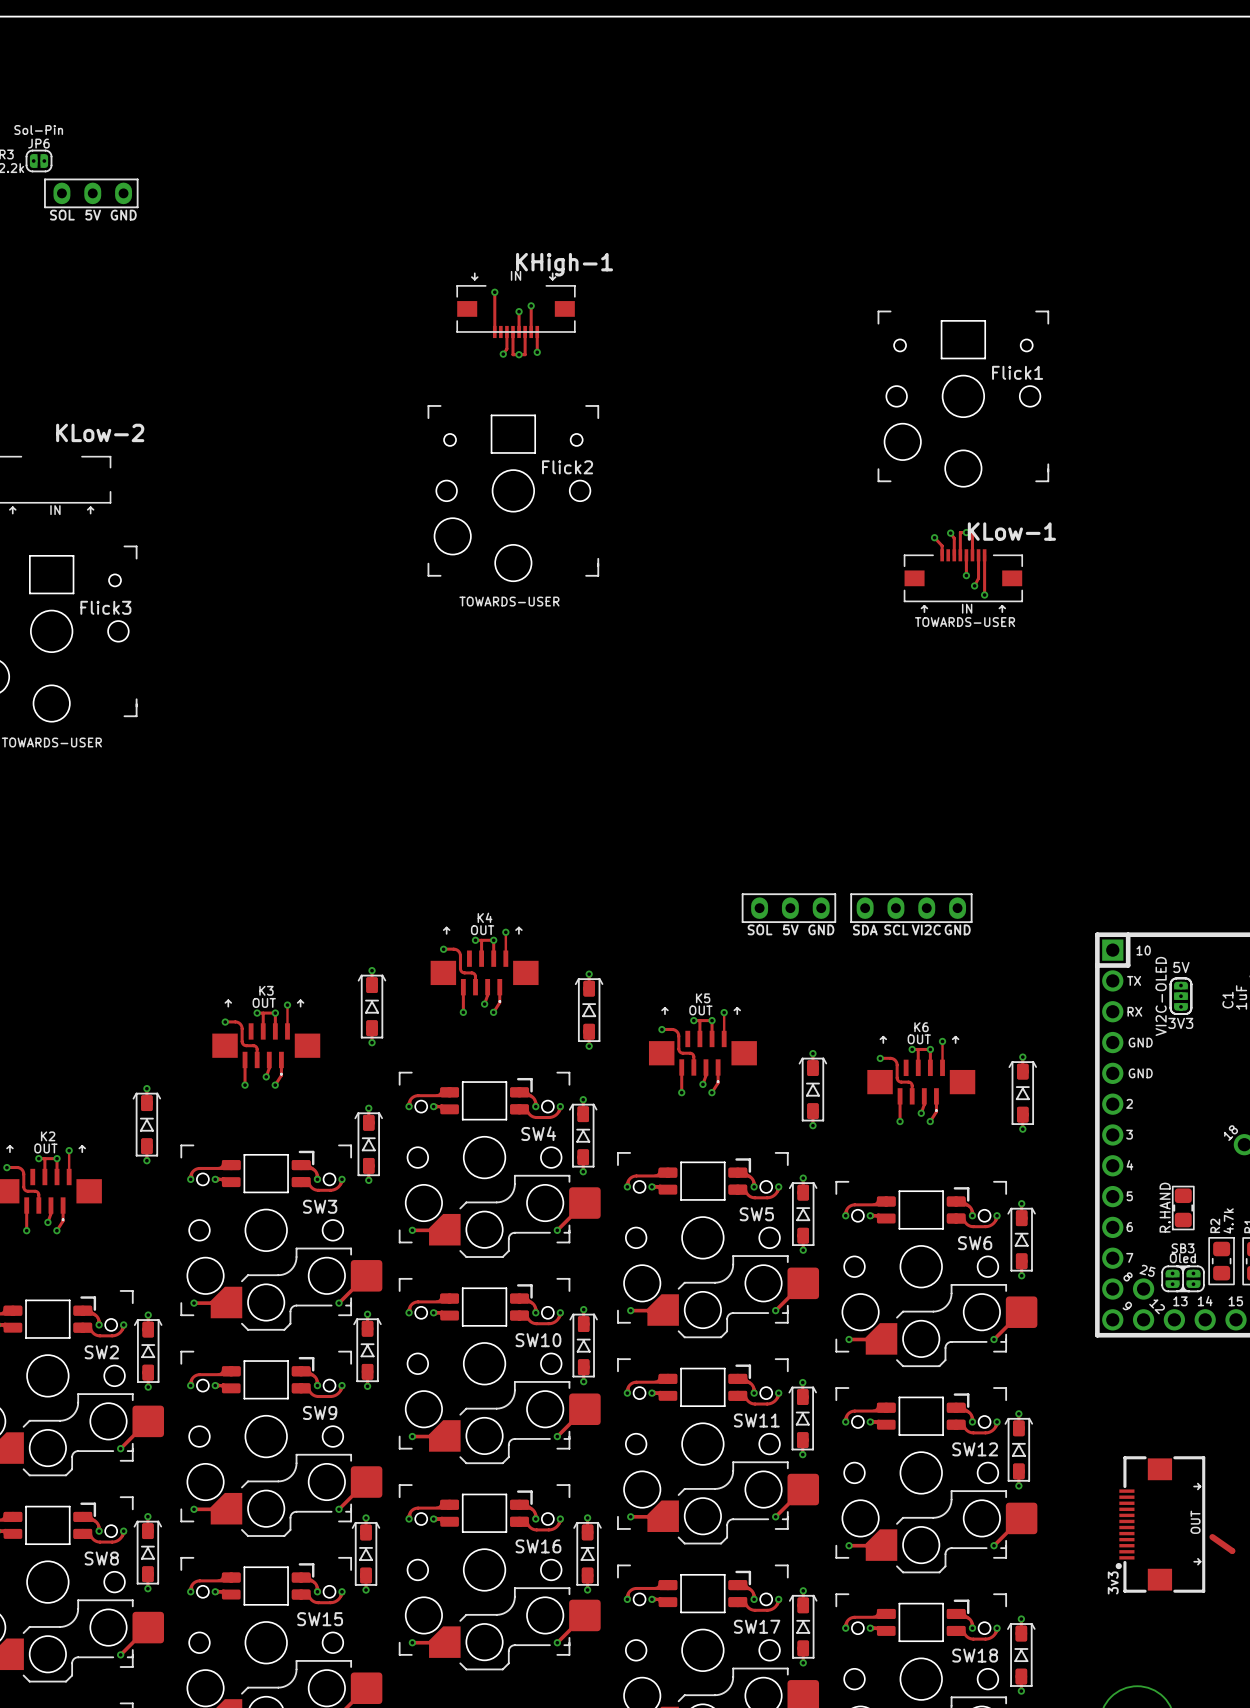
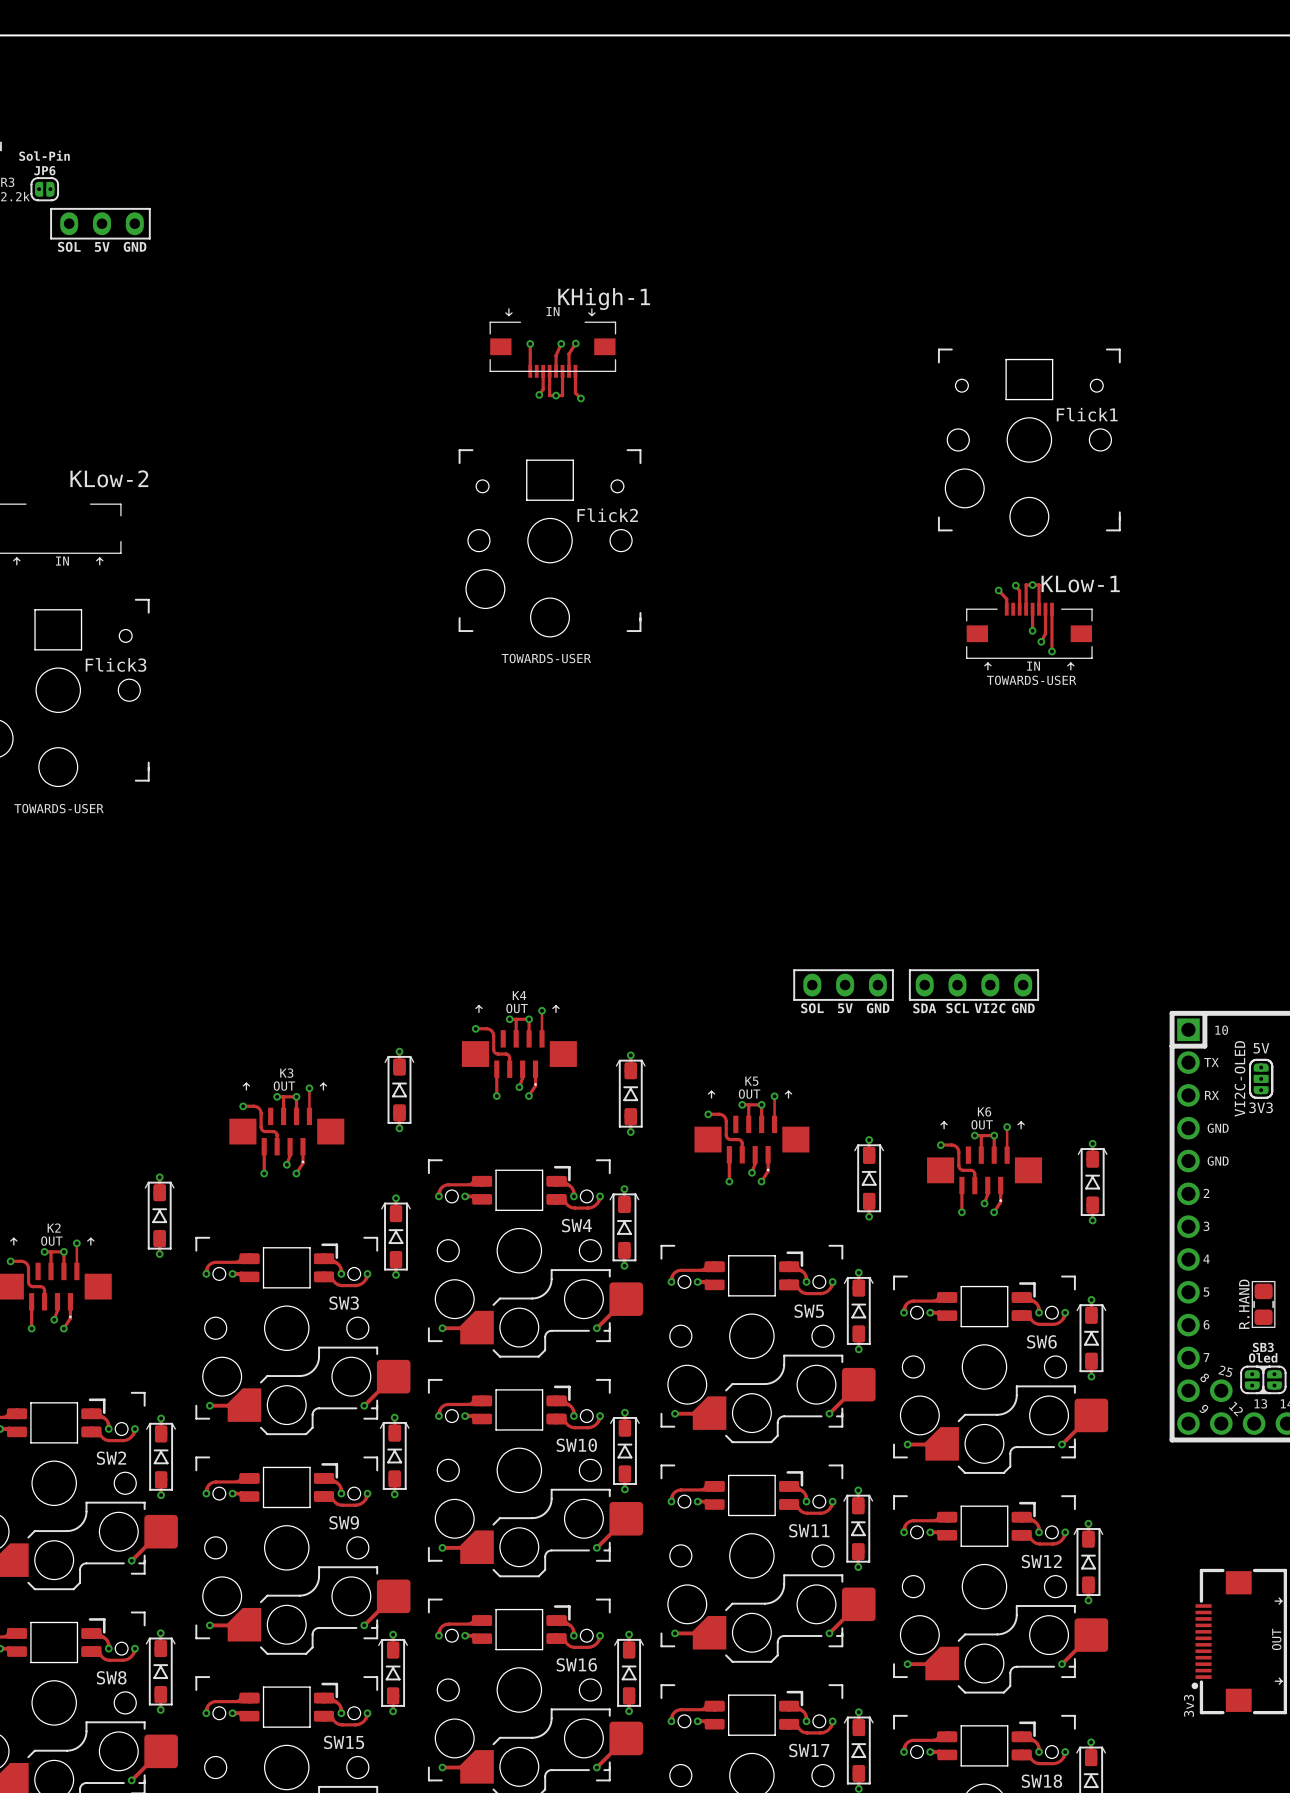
KHigh-1 footprint: [456, 272, 576, 359] -> [489, 308, 617, 403]

